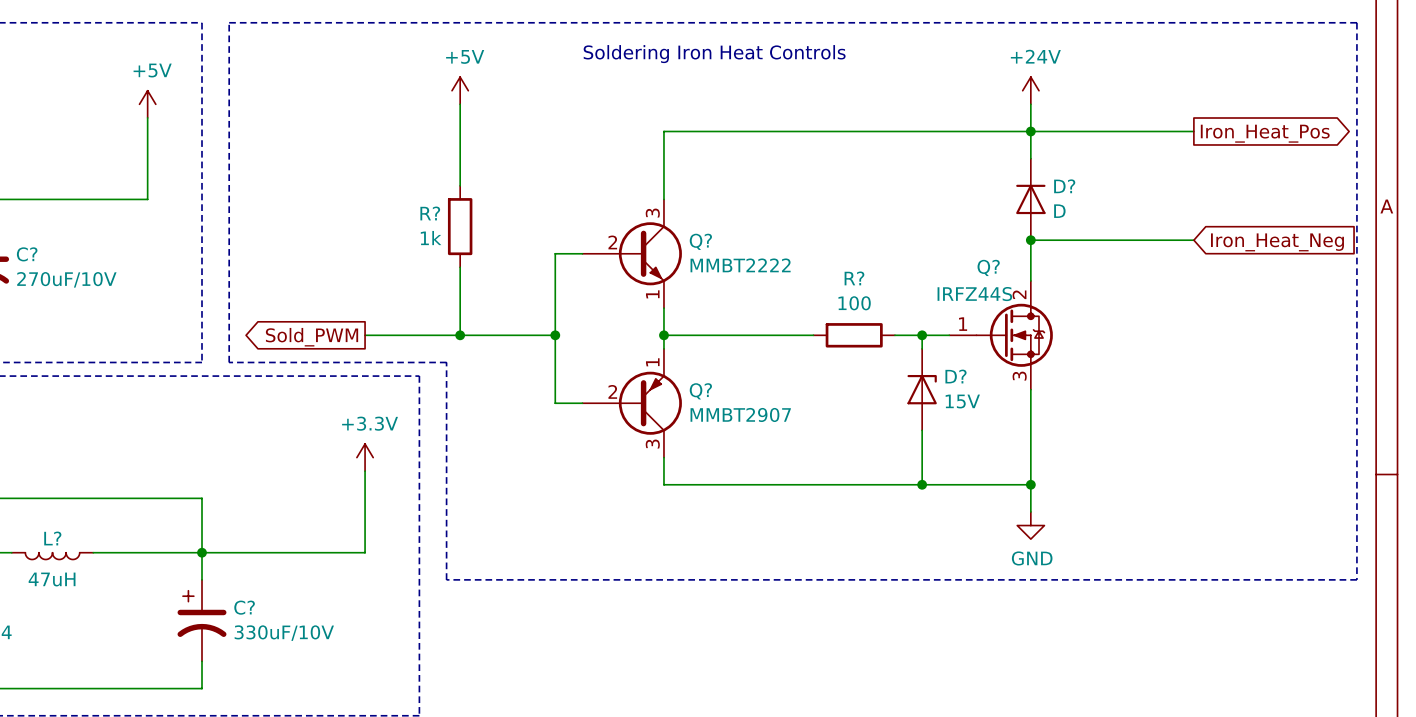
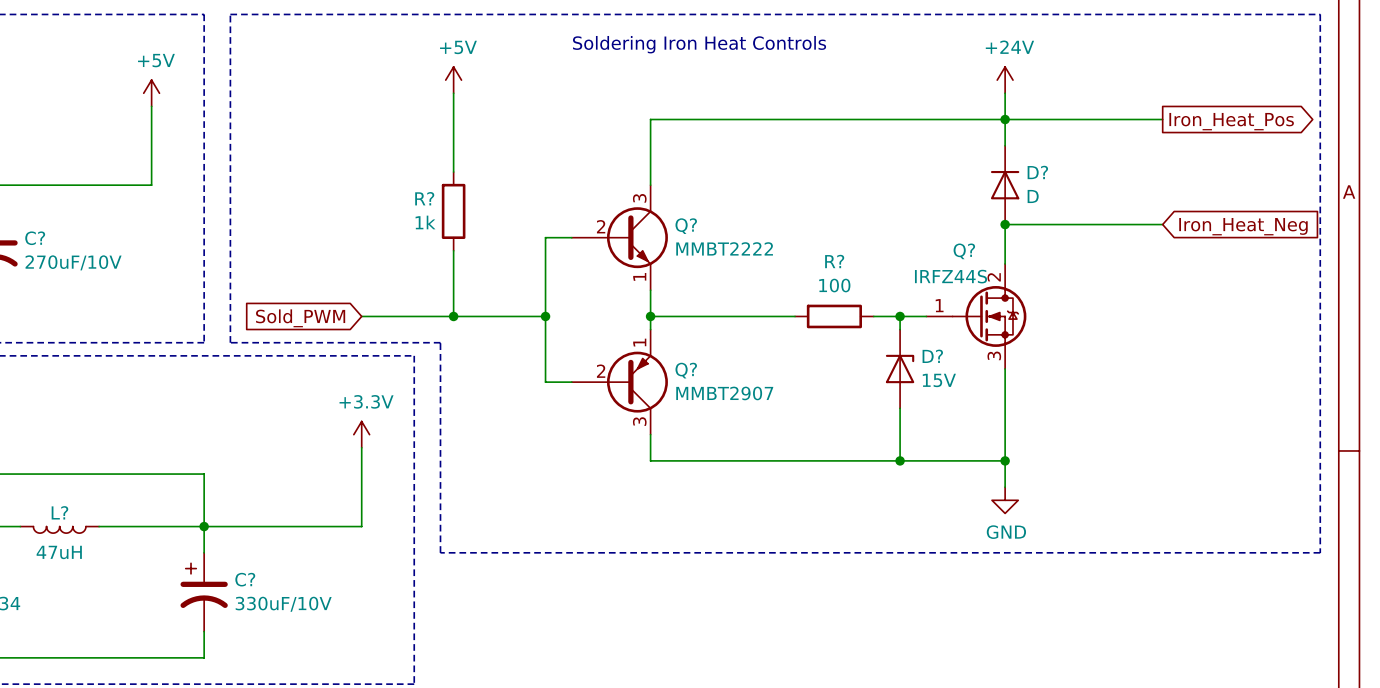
global label shape: output (312, 337) -> input (300, 318)

